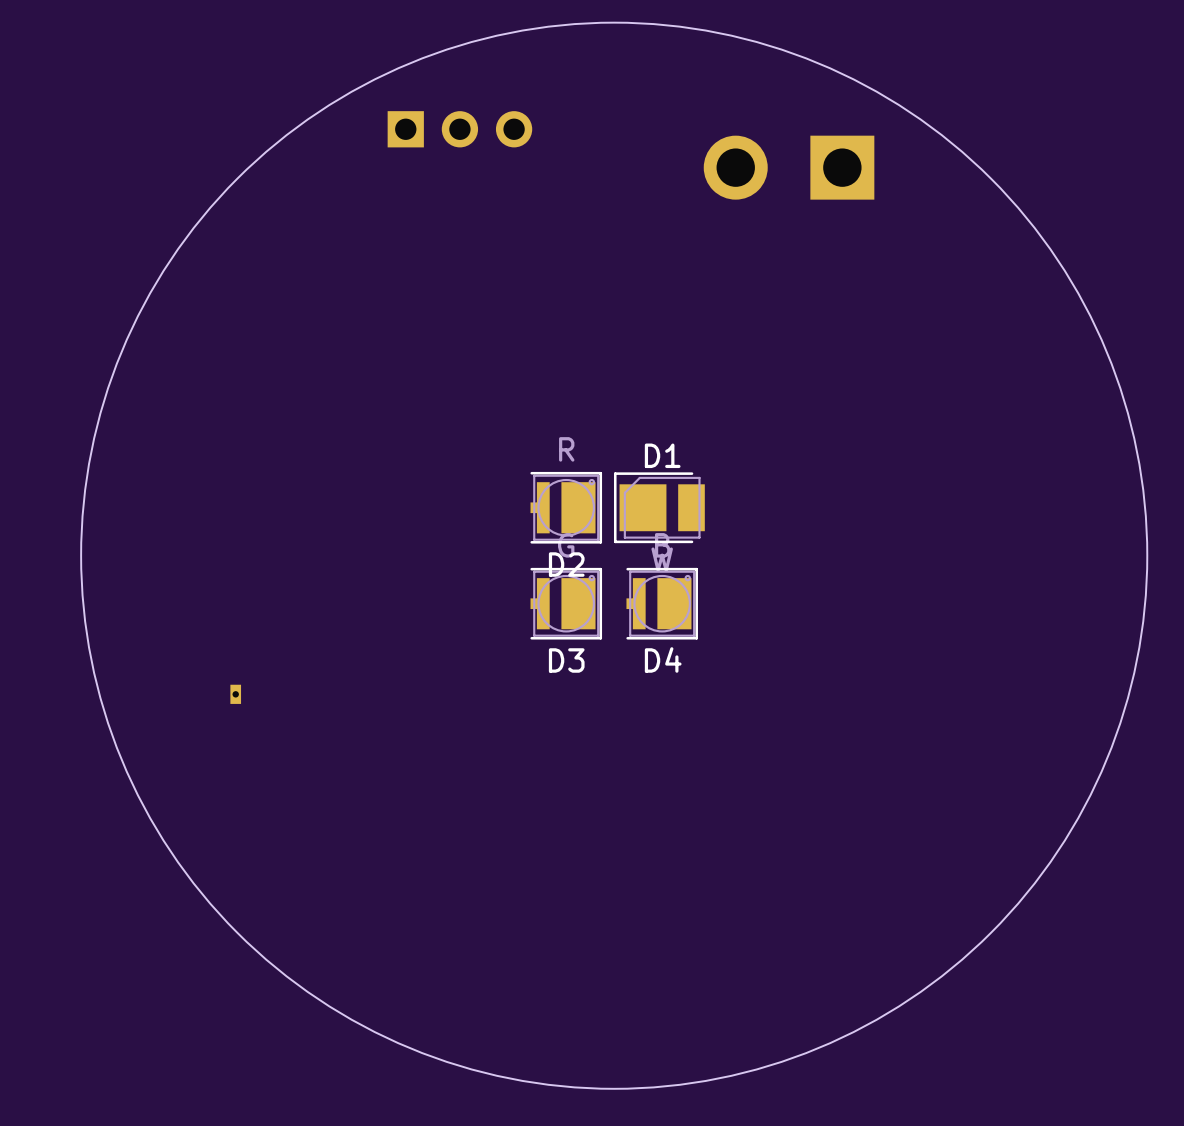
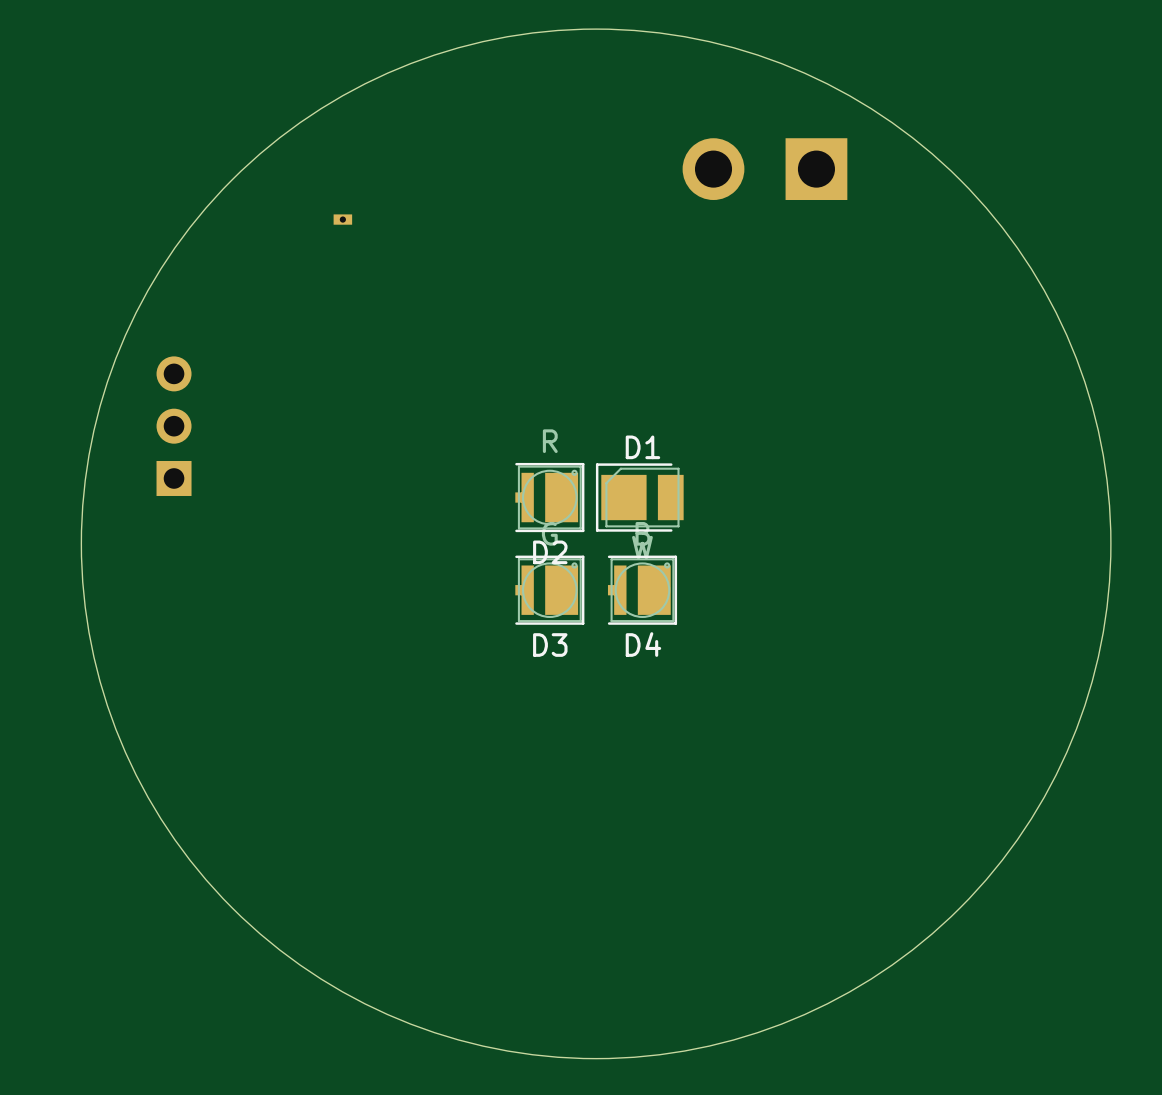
part rotation: 0° (459, 129) -> 90° counterclockwise (174, 426)
part position: (459, 129) -> (174, 426)
part rotation: 0° (235, 694) -> 90° clockwise (342, 219)
part position: (235, 694) -> (342, 219)

